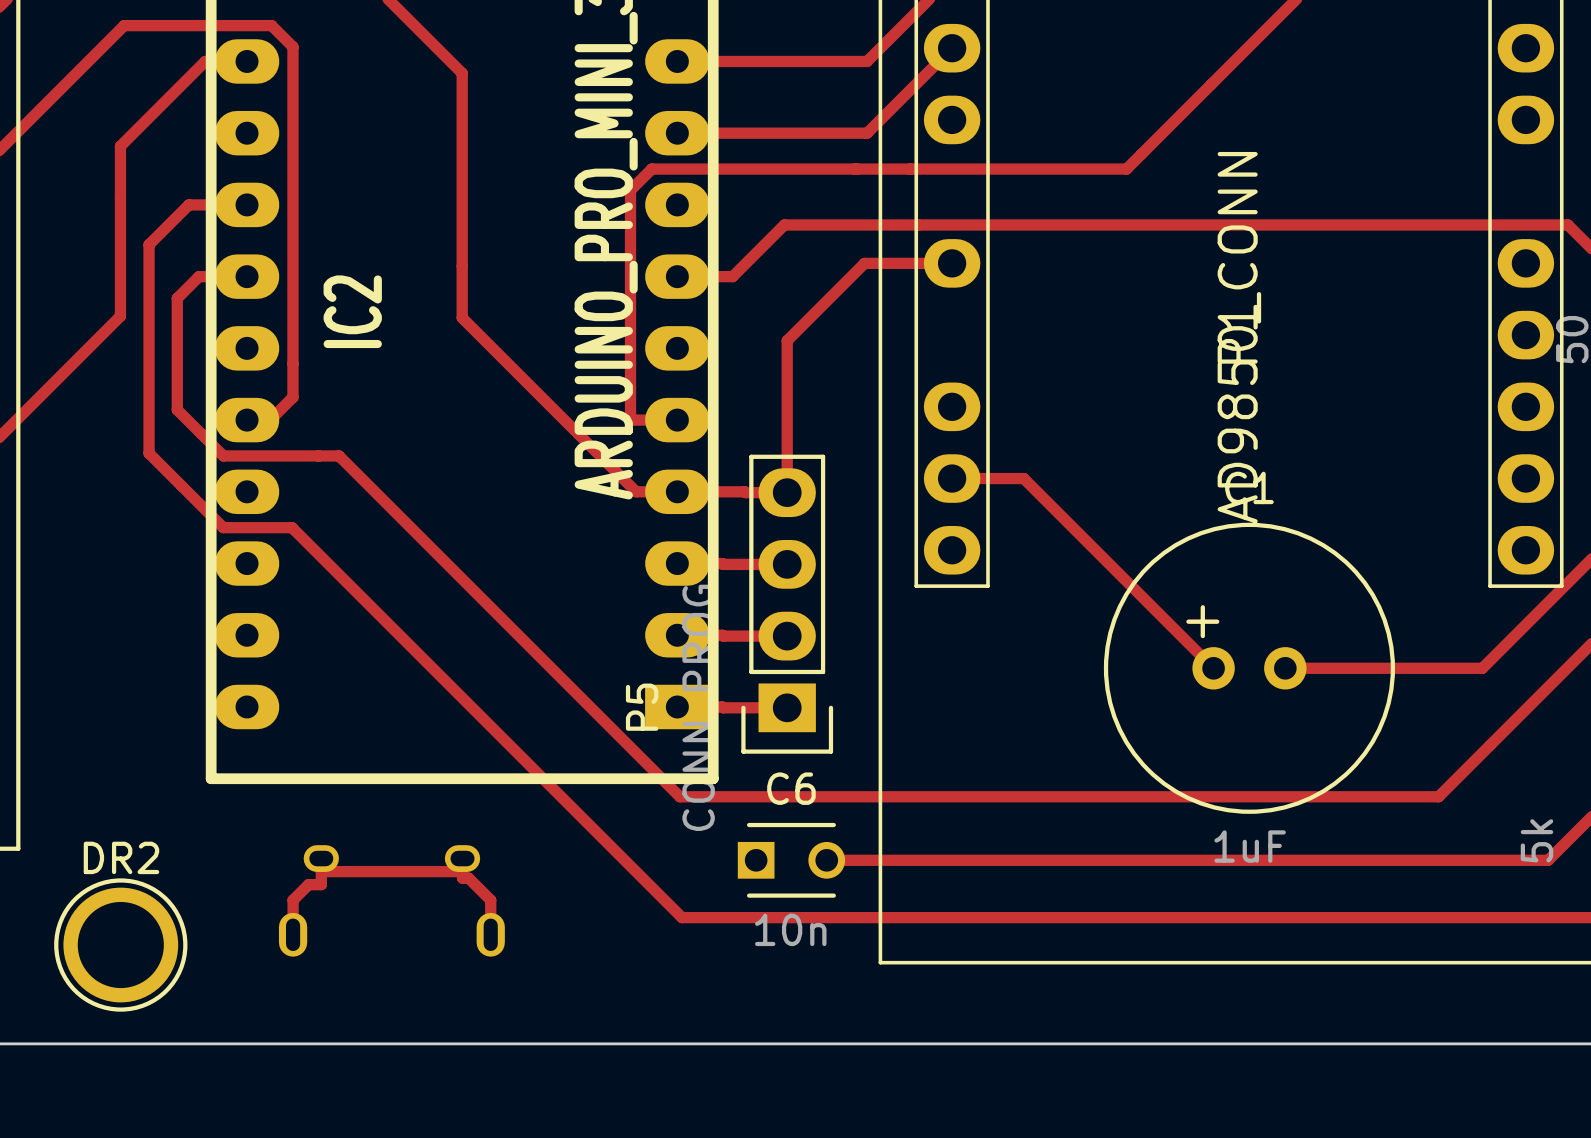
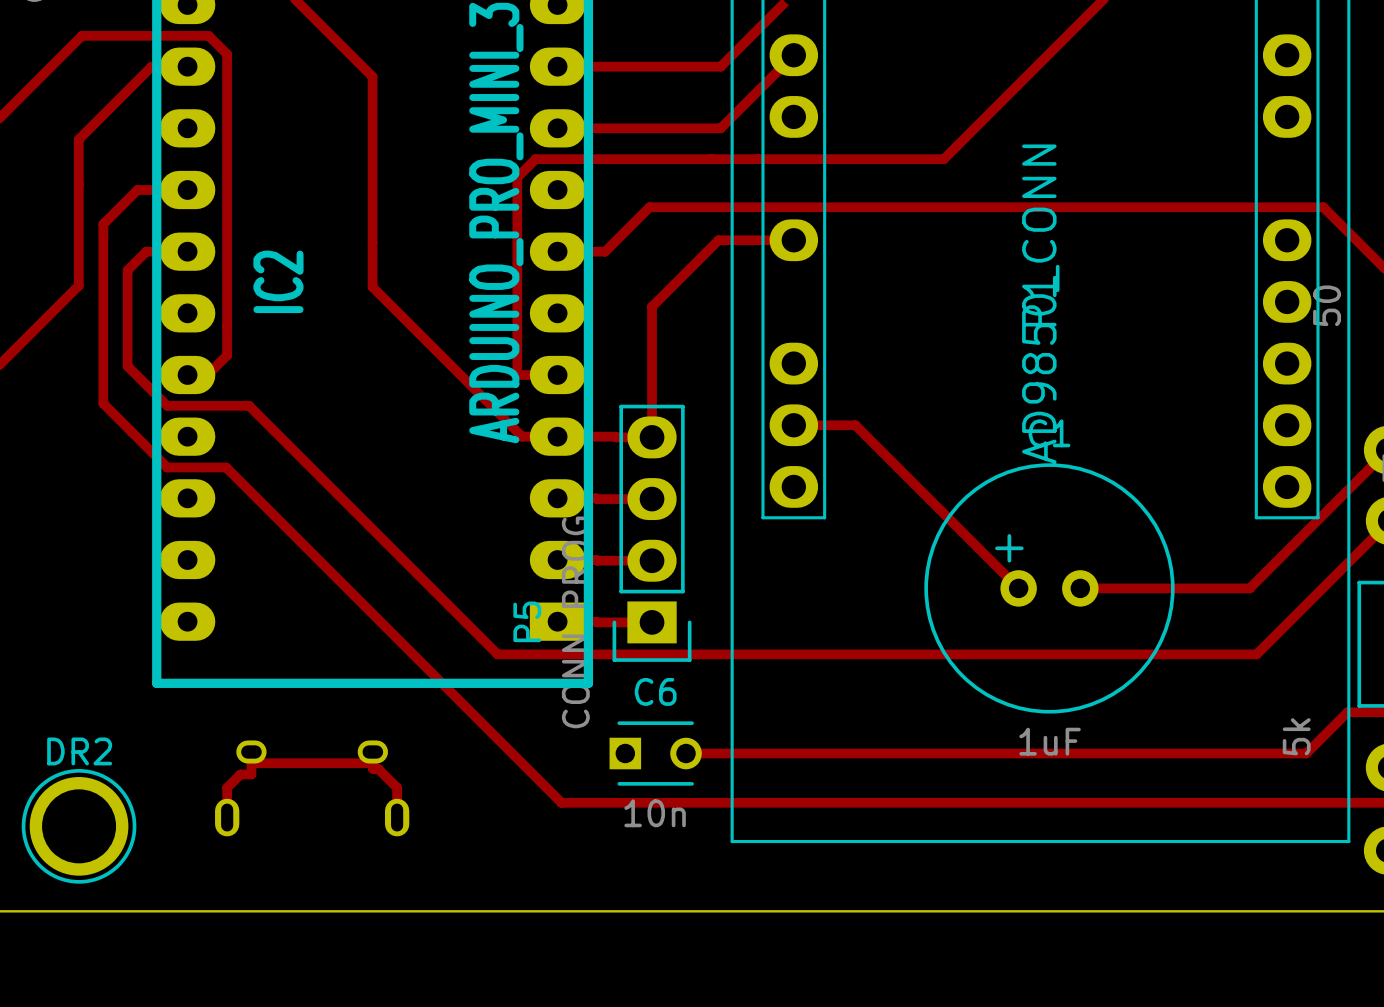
track: (318, 455) (339, 455) (679, 796) (1438, 796) (1490, 745) -> (249, 405) (497, 654) (1256, 654)

